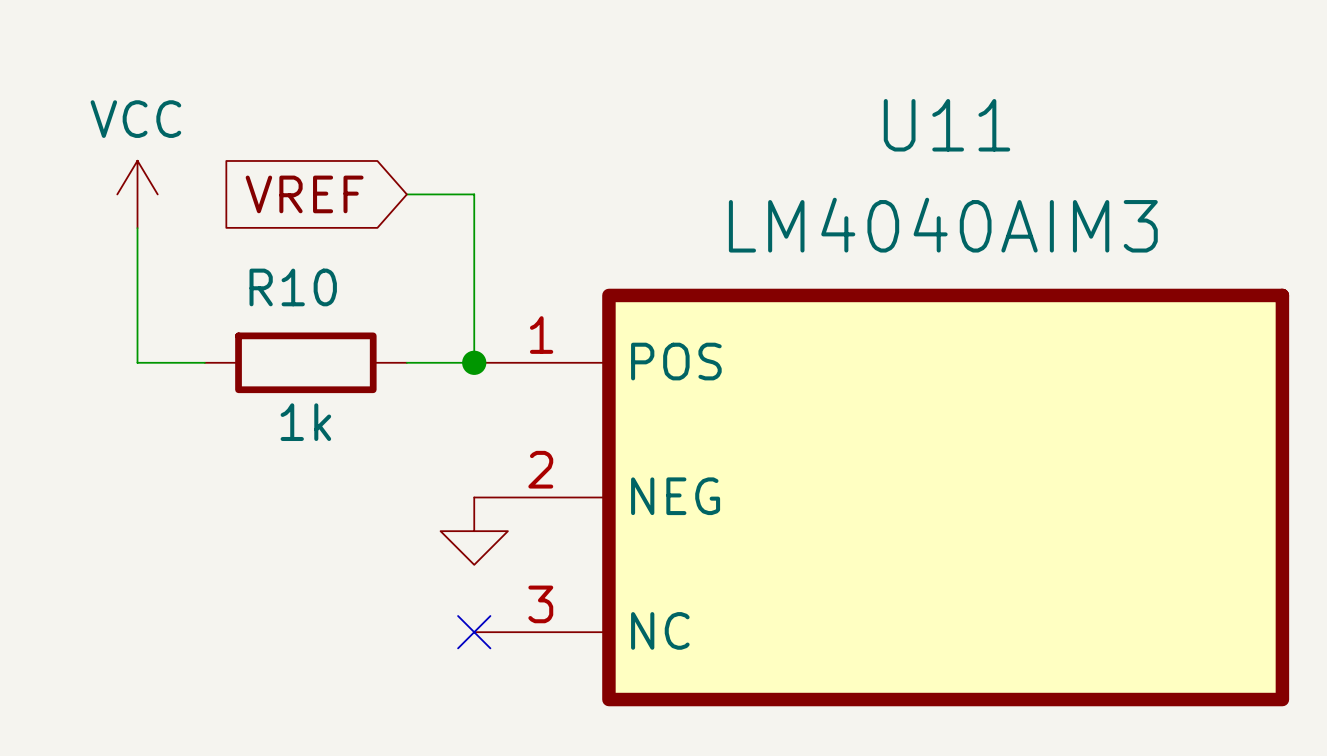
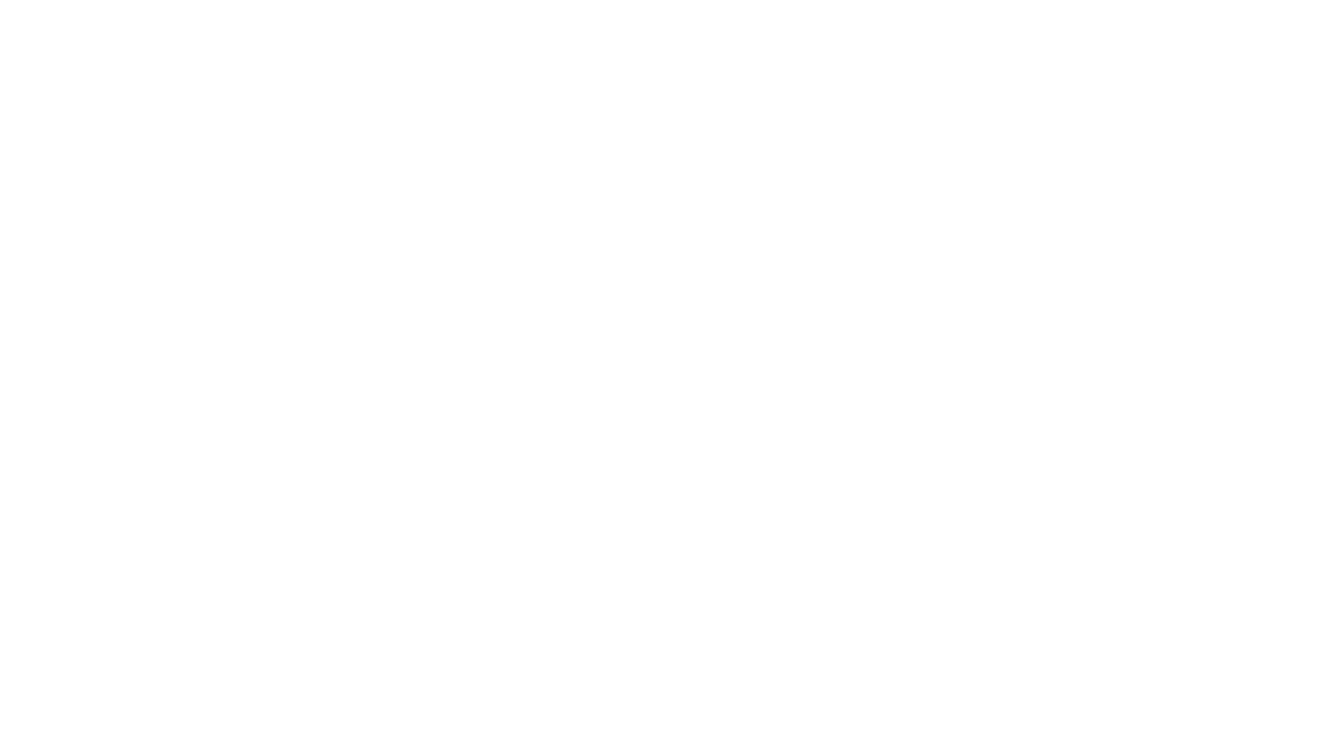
power symbol: VCC (137, 194) -> none
global label: VREF (304, 194) -> none
wire: (406, 194) (474, 194) (474, 362) (406, 362) -> none
wire: (137, 228) (137, 362) (204, 362) -> none
R10: 1k (305, 362) -> none
junction: (474, 362) -> none
U11: LM4040AIM3 (881, 497) -> none
power symbol: (474, 531) -> none
no-connect mark: (474, 632) -> none

